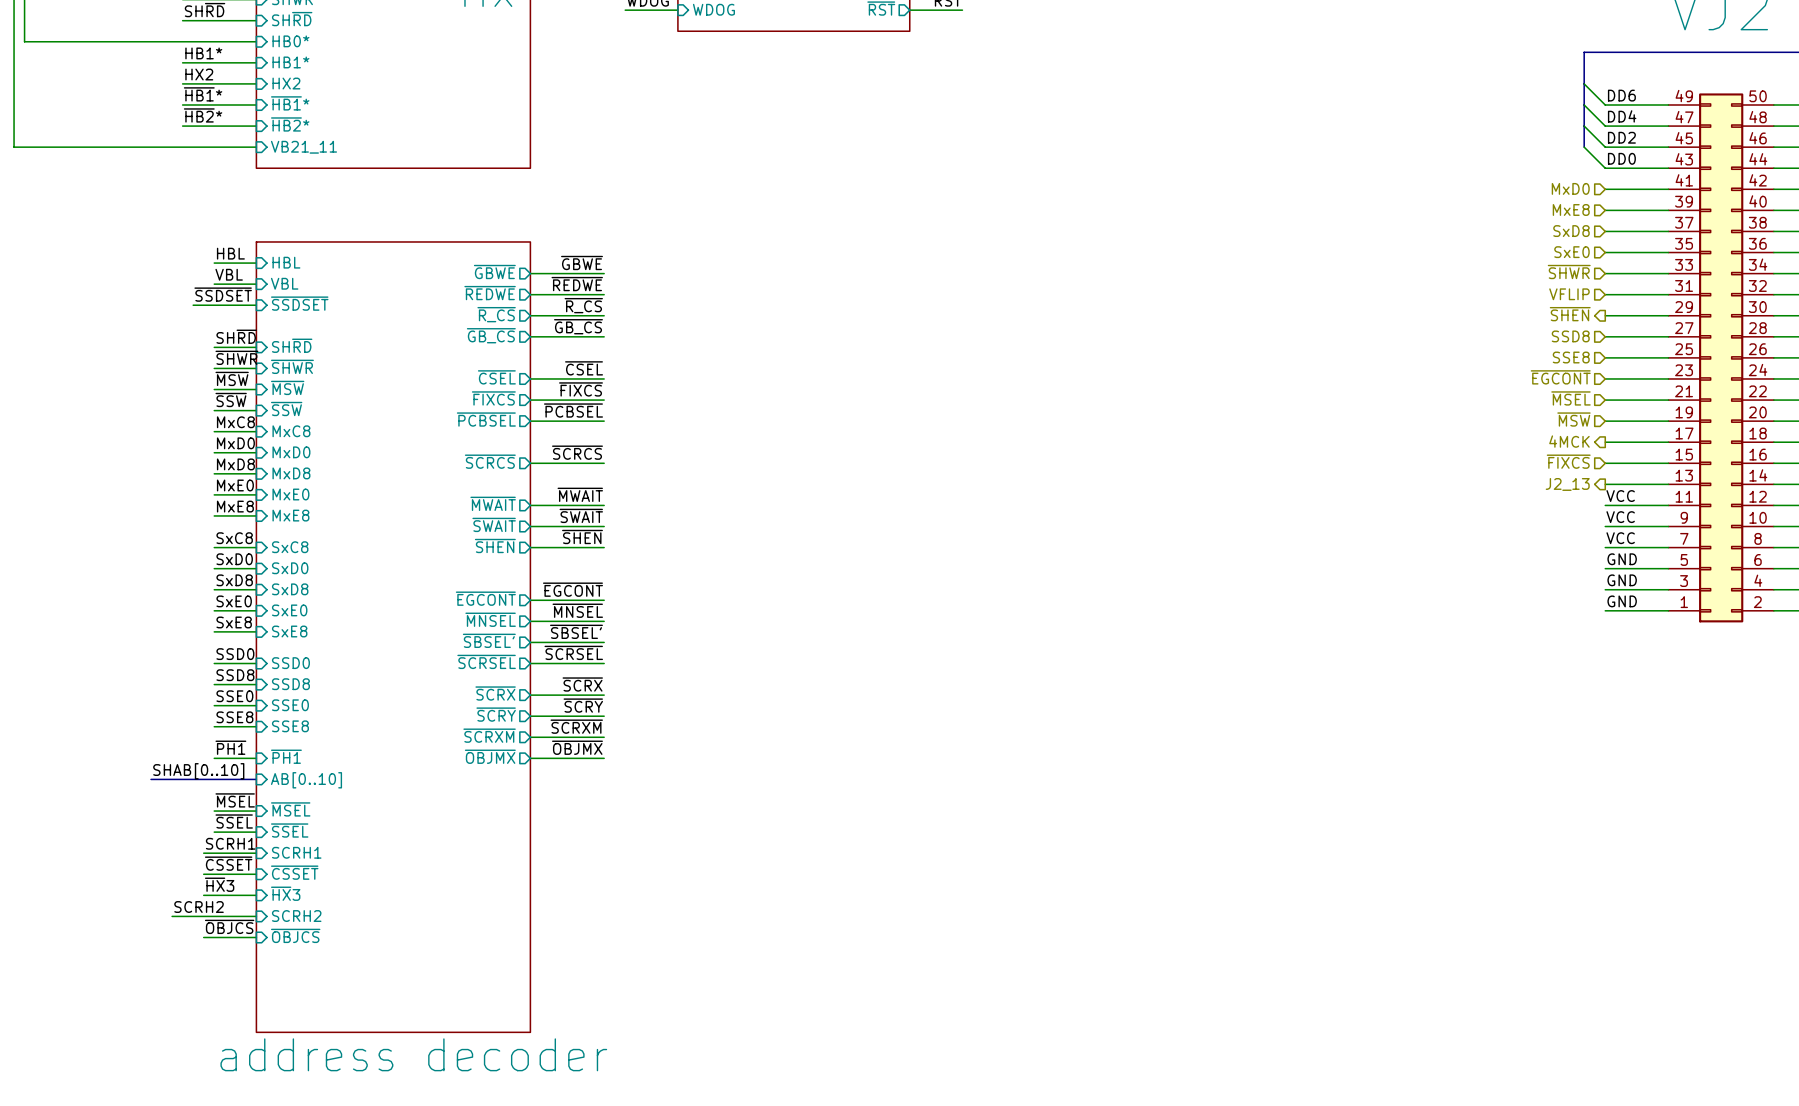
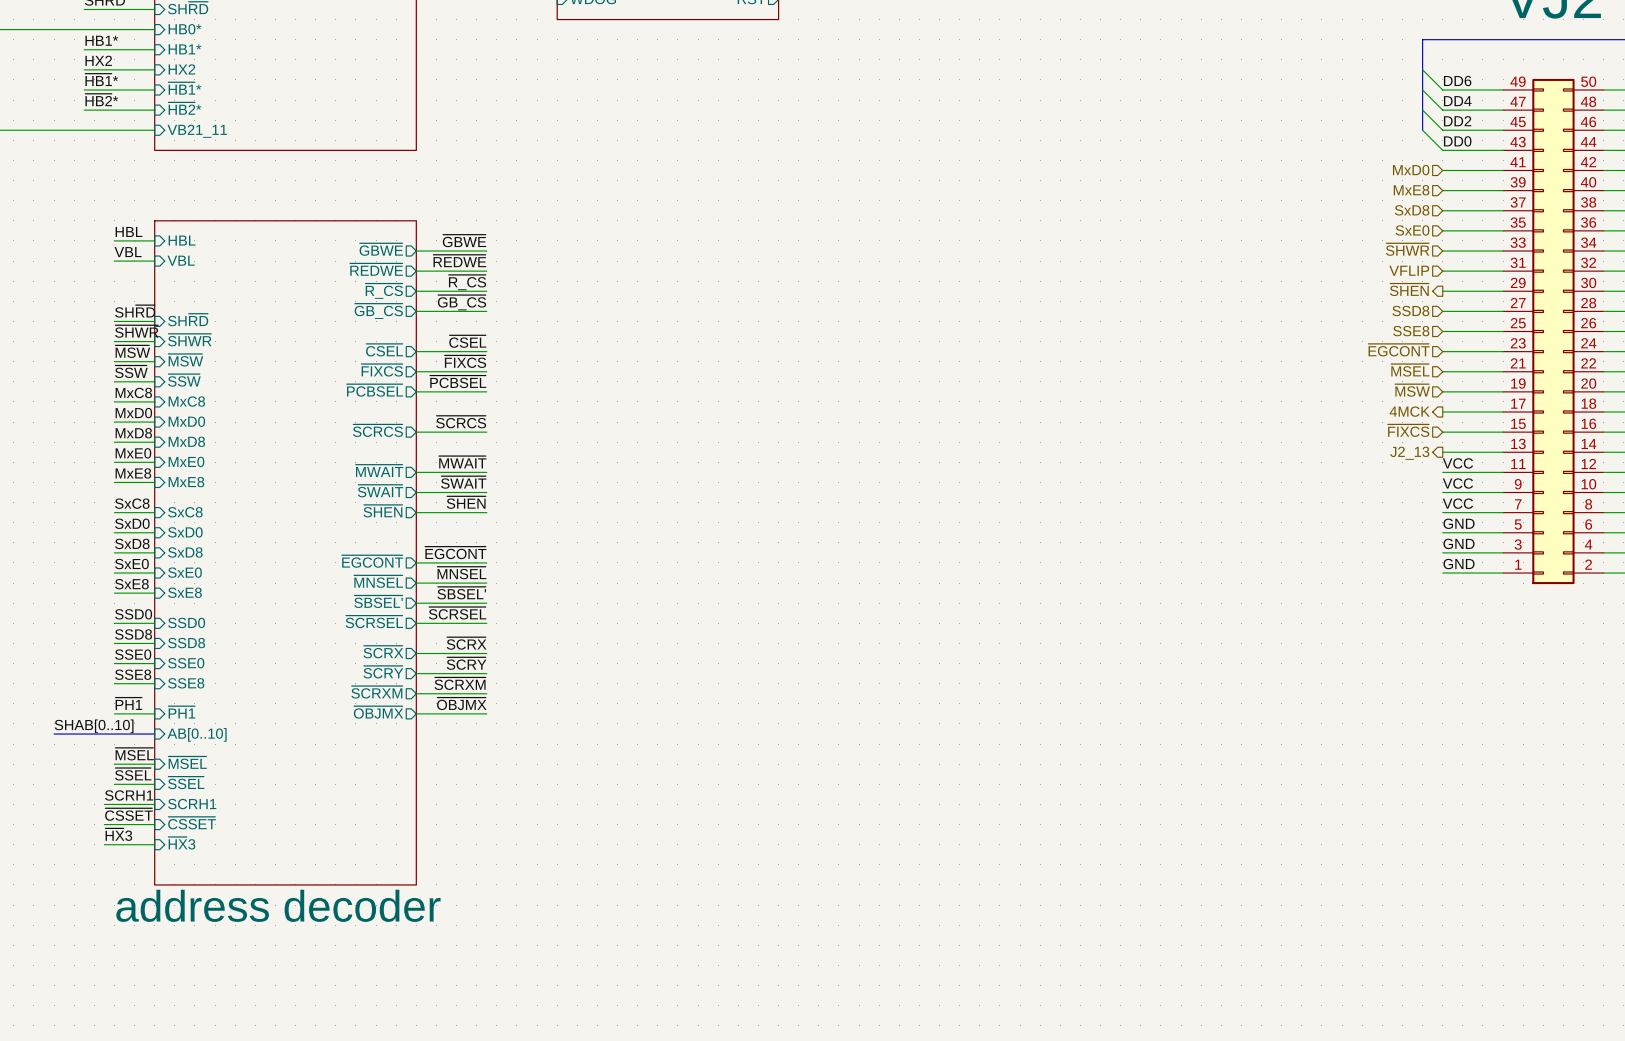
label: ~{SSDSET} (223, 294) -> none
sheet pin: ~{SSDSET} (299, 303) -> none
wire: (193, 305) (256, 305) -> none
sheet address decoder: none -> (285, 552)
sheet address decoder: (393, 637) -> none
label: SCRH2 (199, 907) -> none
wire: (172, 916) (256, 916) -> none
sheet pin: SCRH2 (296, 916) -> none
label: ~{OBJCS} (229, 926) -> none
sheet pin: ~{OBJCS} (295, 935) -> none
wire: (203, 937) (256, 937) -> none

